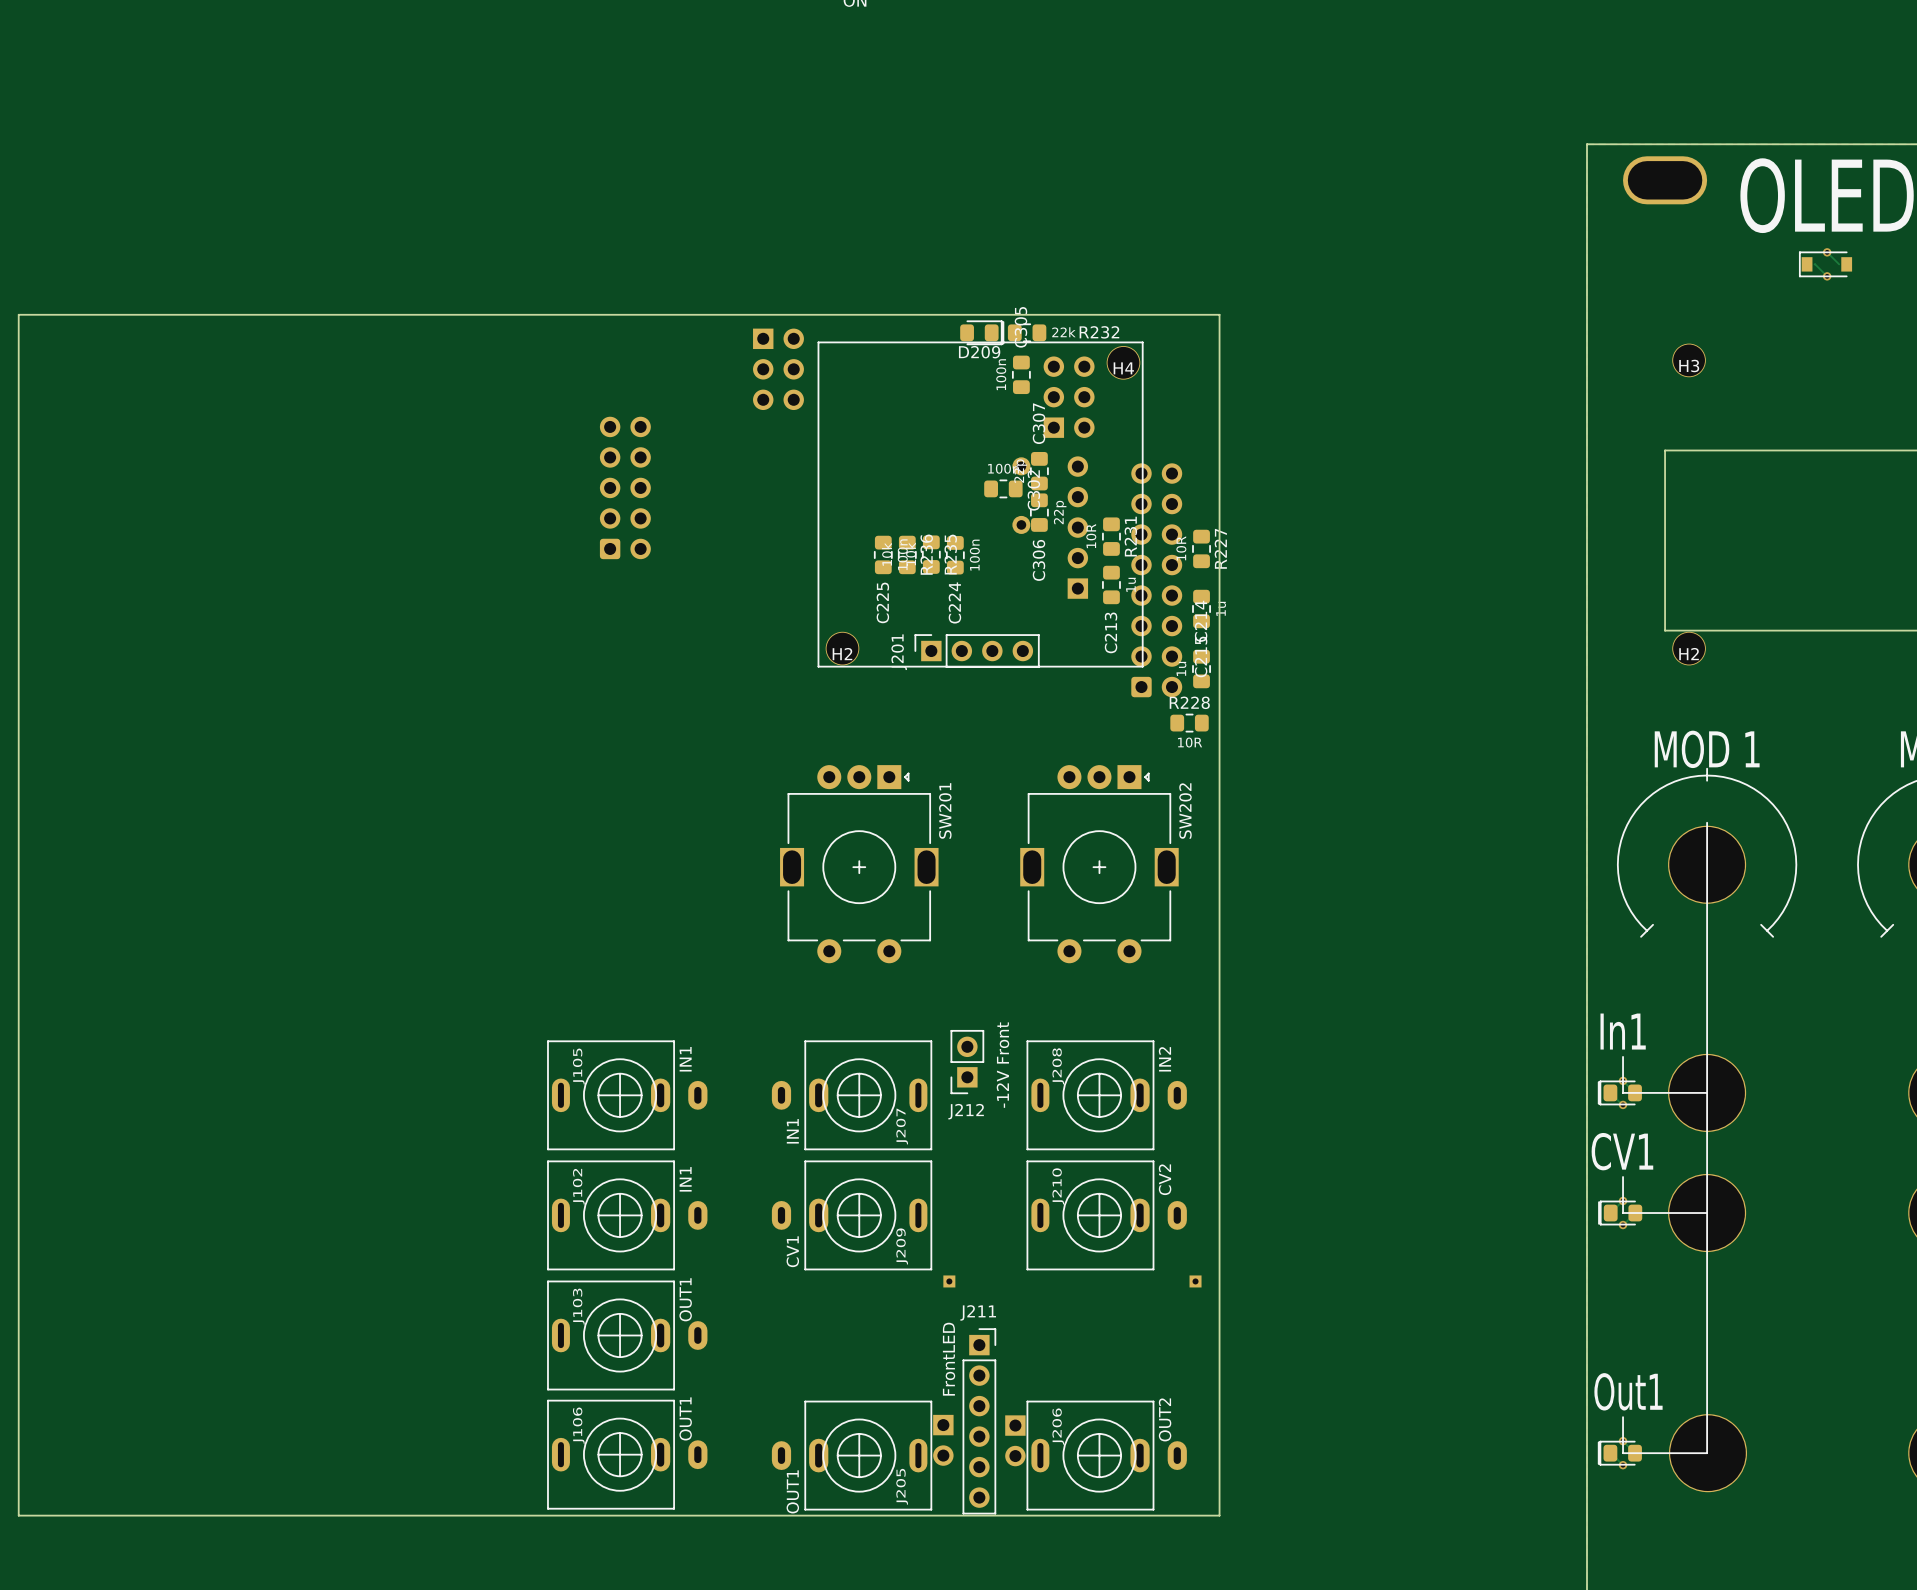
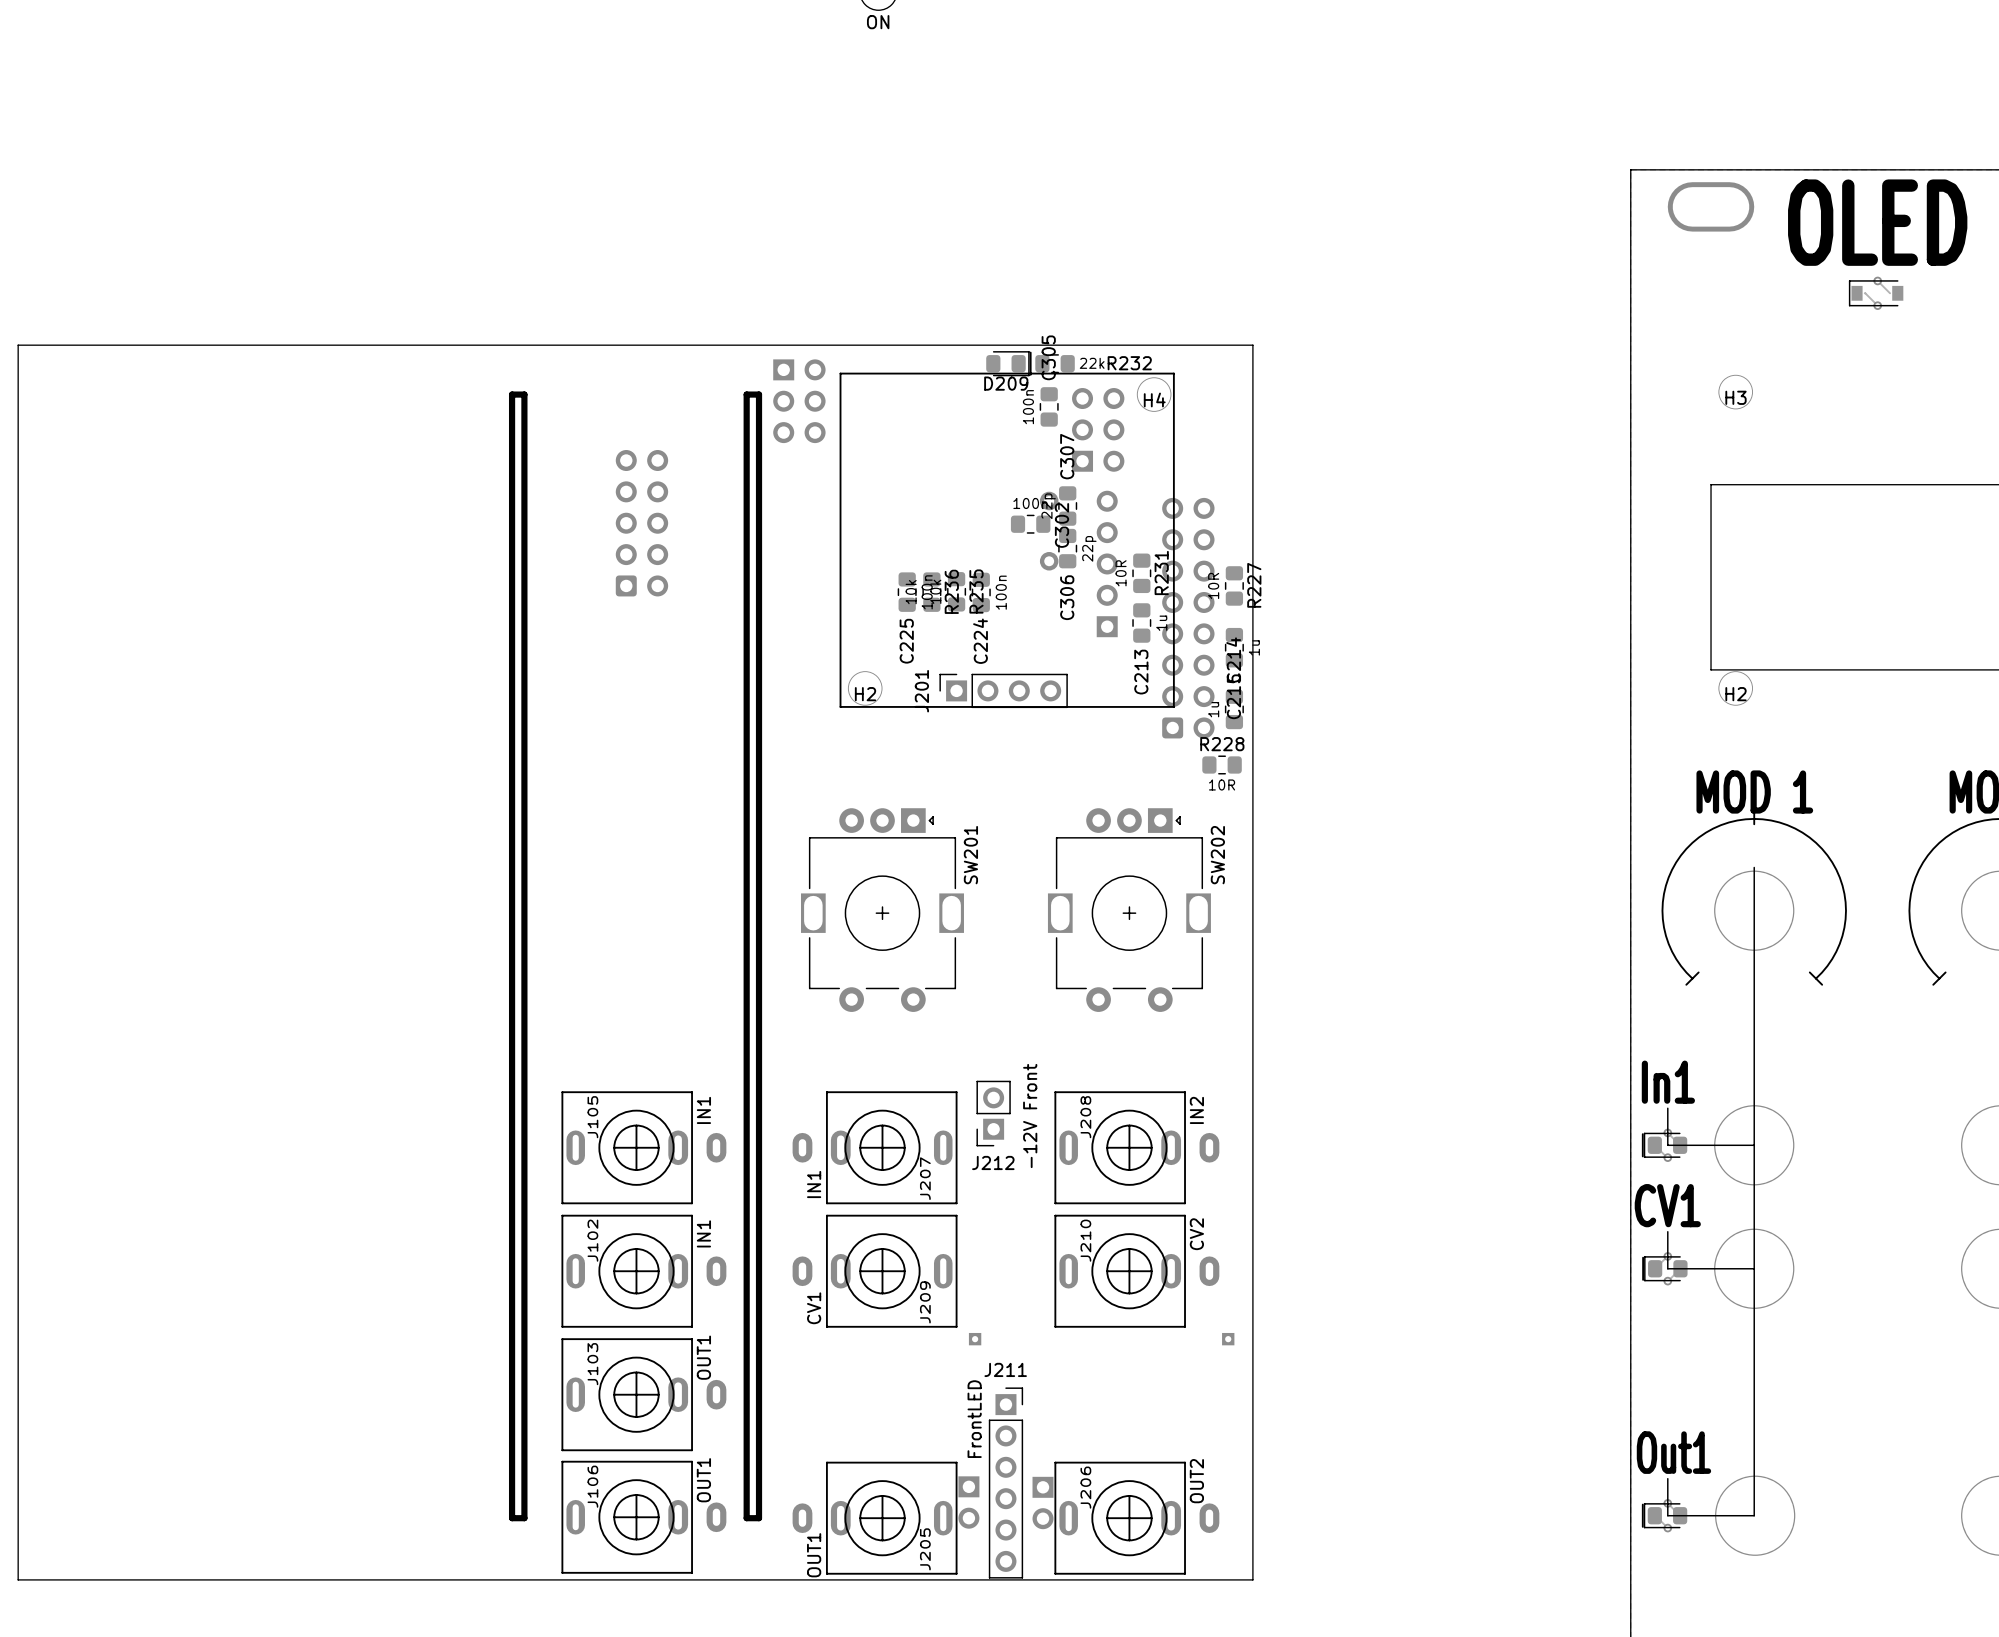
board edge: none -> (512, 394) (512, 1518) (524, 1518) (524, 394) (512, 394)
board edge: none -> (746, 394) (759, 394) (759, 1518) (746, 1518) (746, 394)

